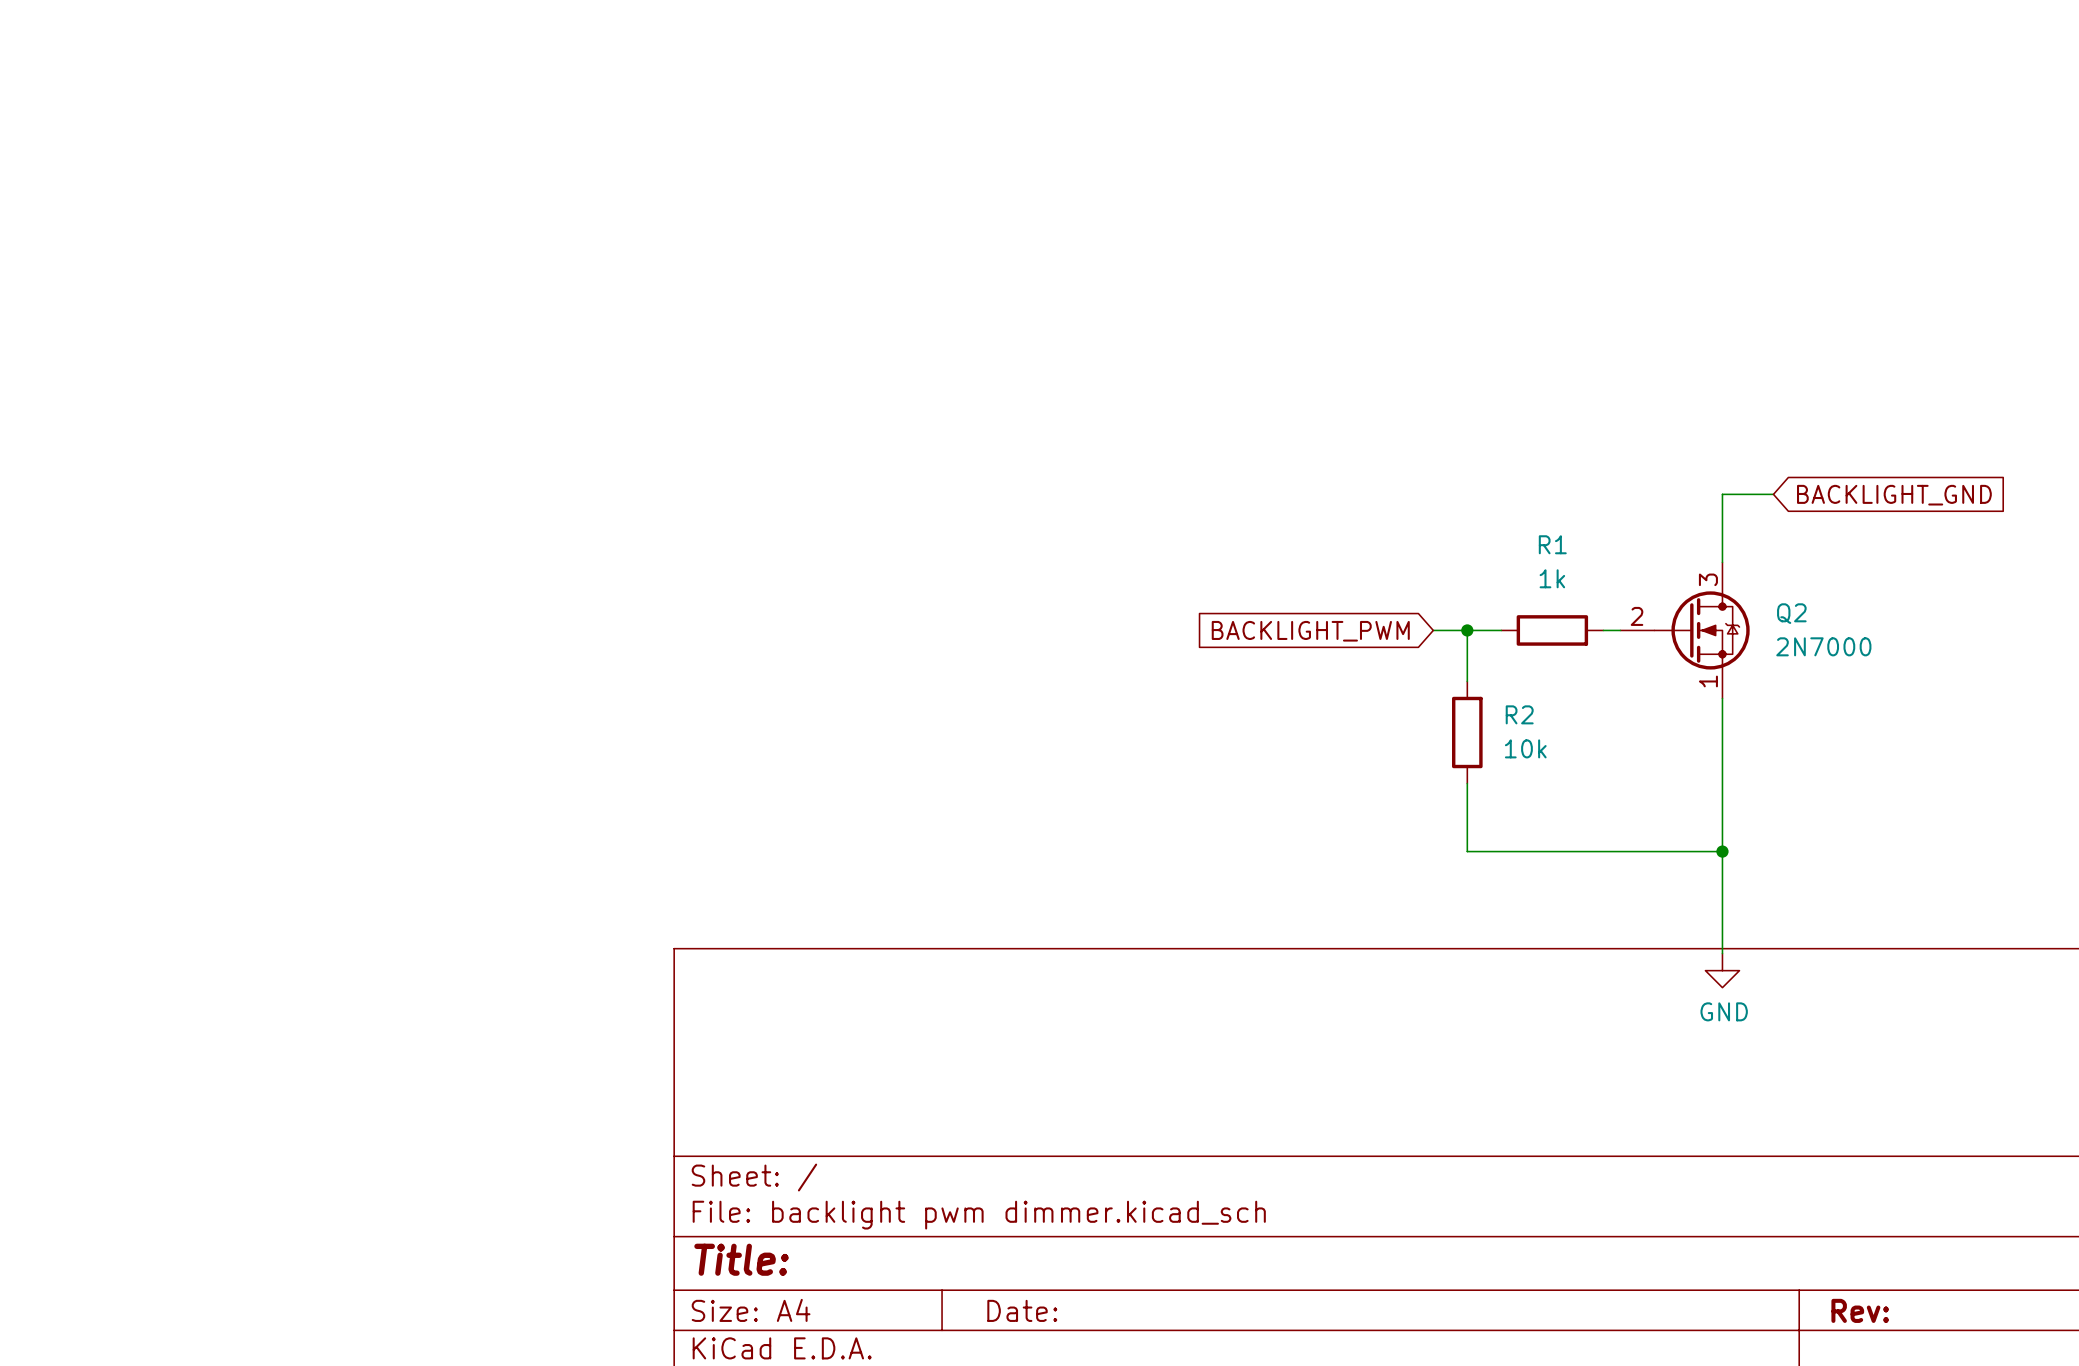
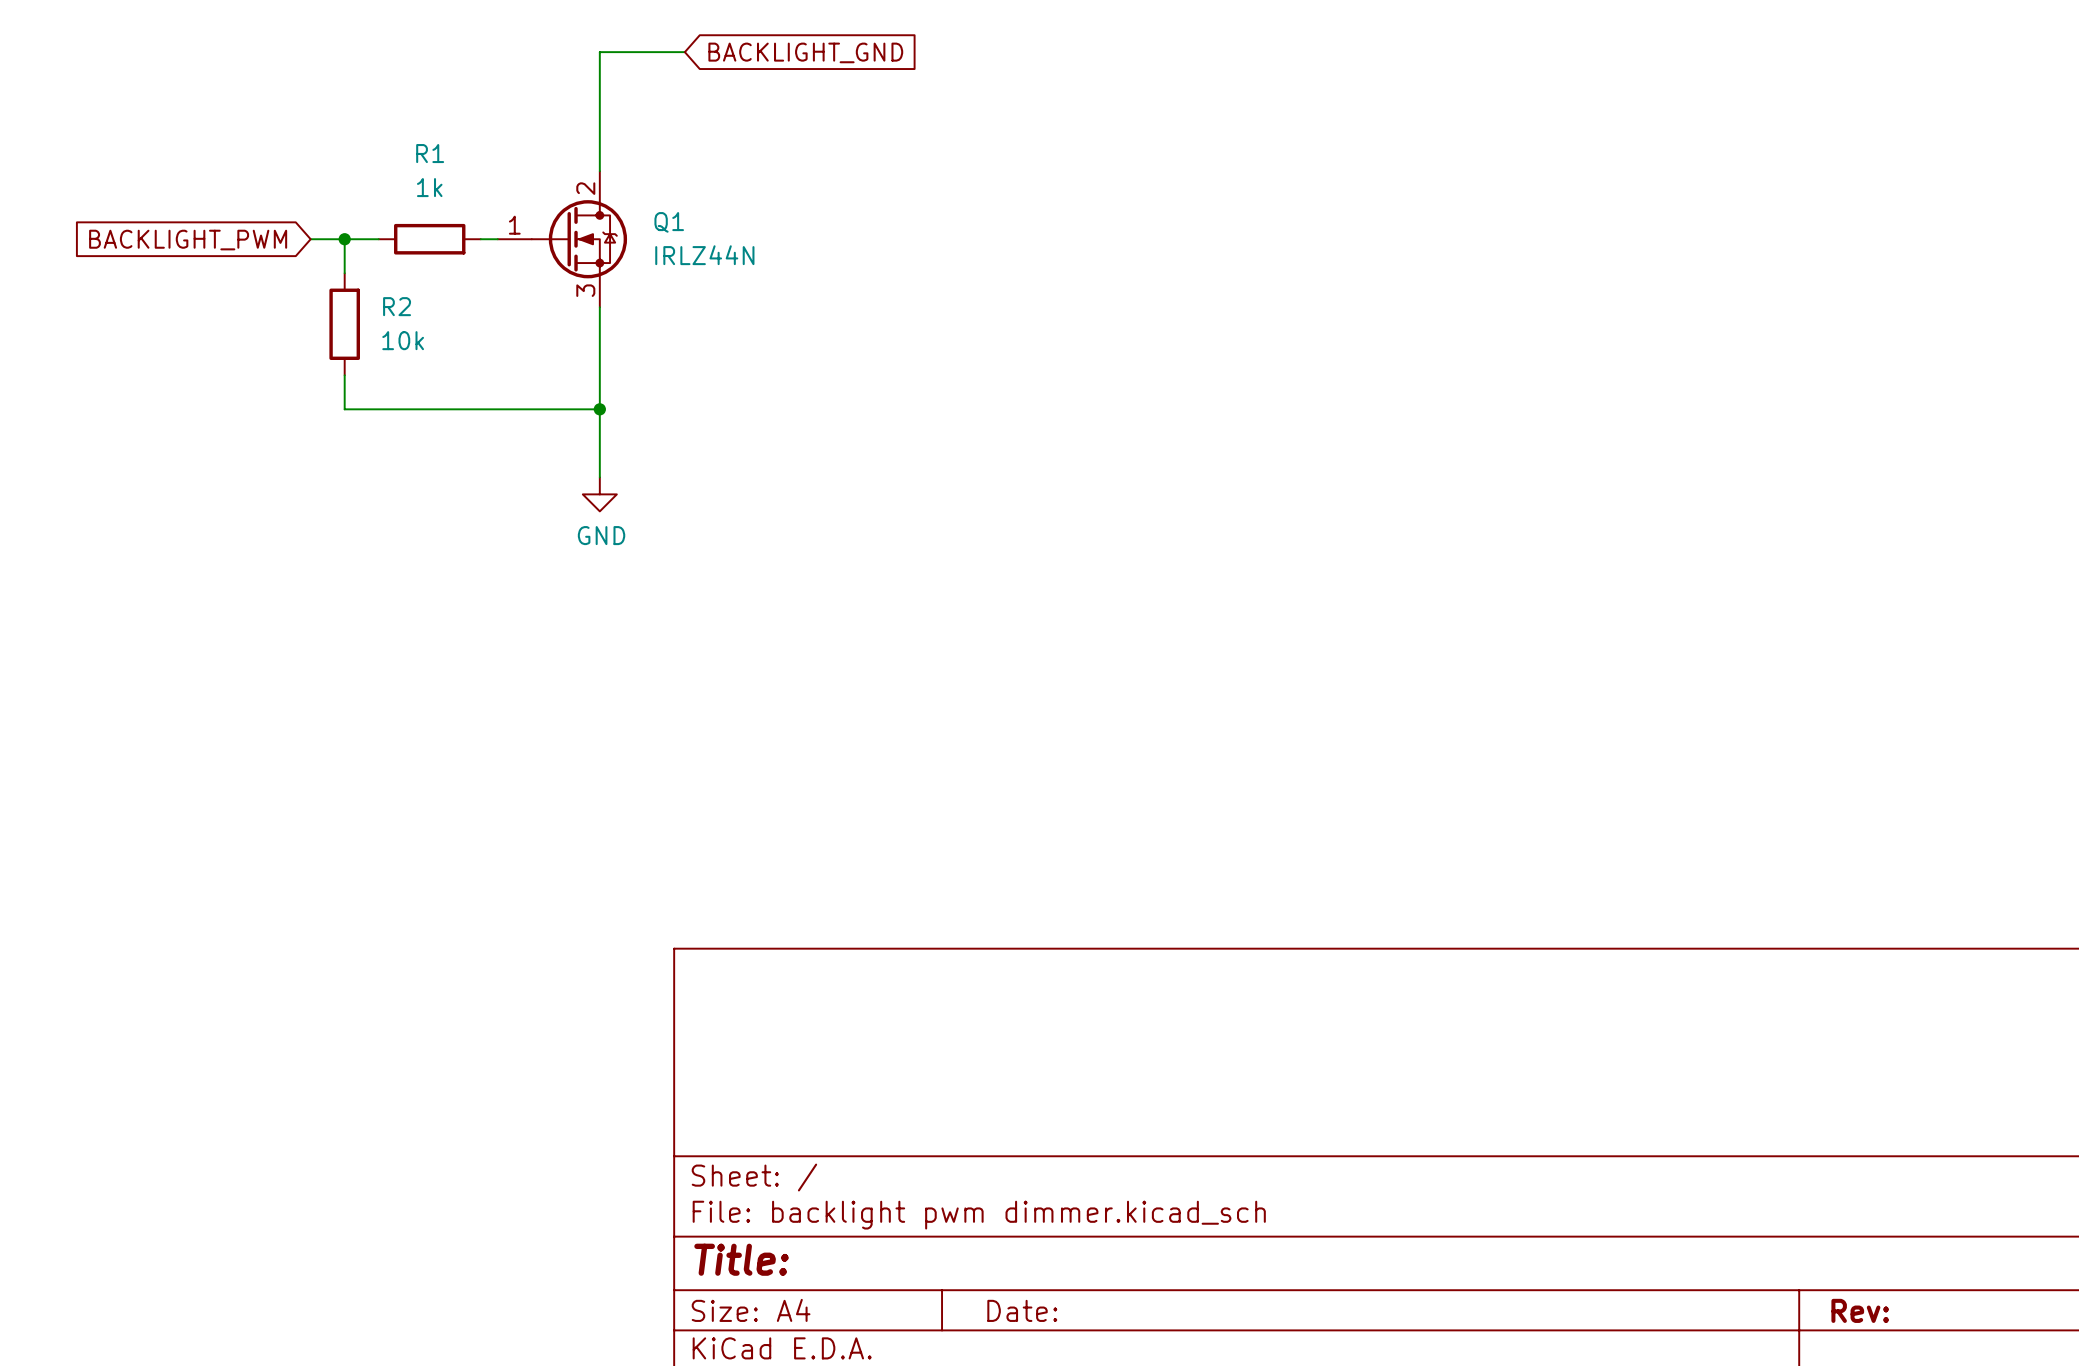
wire: none -> (684, 52) (599, 52) (599, 171)
global label: none -> BACKLIGHT_GND (805, 52)
wire: none -> (310, 239) (378, 239)
wire: none -> (344, 239) (344, 273)
junction: none -> (344, 239)
wire: none -> (480, 239) (497, 239)
Q1: none -> IRLZ44N (562, 239)
global label: none -> BACKLIGHT_PWM (188, 240)
wire: none -> (599, 307) (599, 477)
wire: none -> (344, 375) (344, 409) (599, 409)
junction: none -> (599, 409)
power symbol: none -> GND (599, 494)
wire: (1773, 494) (1722, 494) (1722, 562) -> none
global label: BACKLIGHT_GND (1894, 495) -> none
wire: (1433, 630) (1501, 630) -> none
wire: (1467, 630) (1467, 681) -> none
junction: (1467, 630) -> none
R1 position: (1552, 630) -> (429, 239)
wire: (1603, 630) (1620, 630) -> none
Q2: 2N7000 (1685, 630) -> none
global label: BACKLIGHT_PWM (1310, 631) -> none
wire: (1722, 698) (1722, 953) -> none
R2 position: (1467, 732) -> (344, 324)
wire: (1467, 783) (1467, 851) (1722, 851) -> none
junction: (1722, 851) -> none
power symbol: GND (1722, 970) -> none

